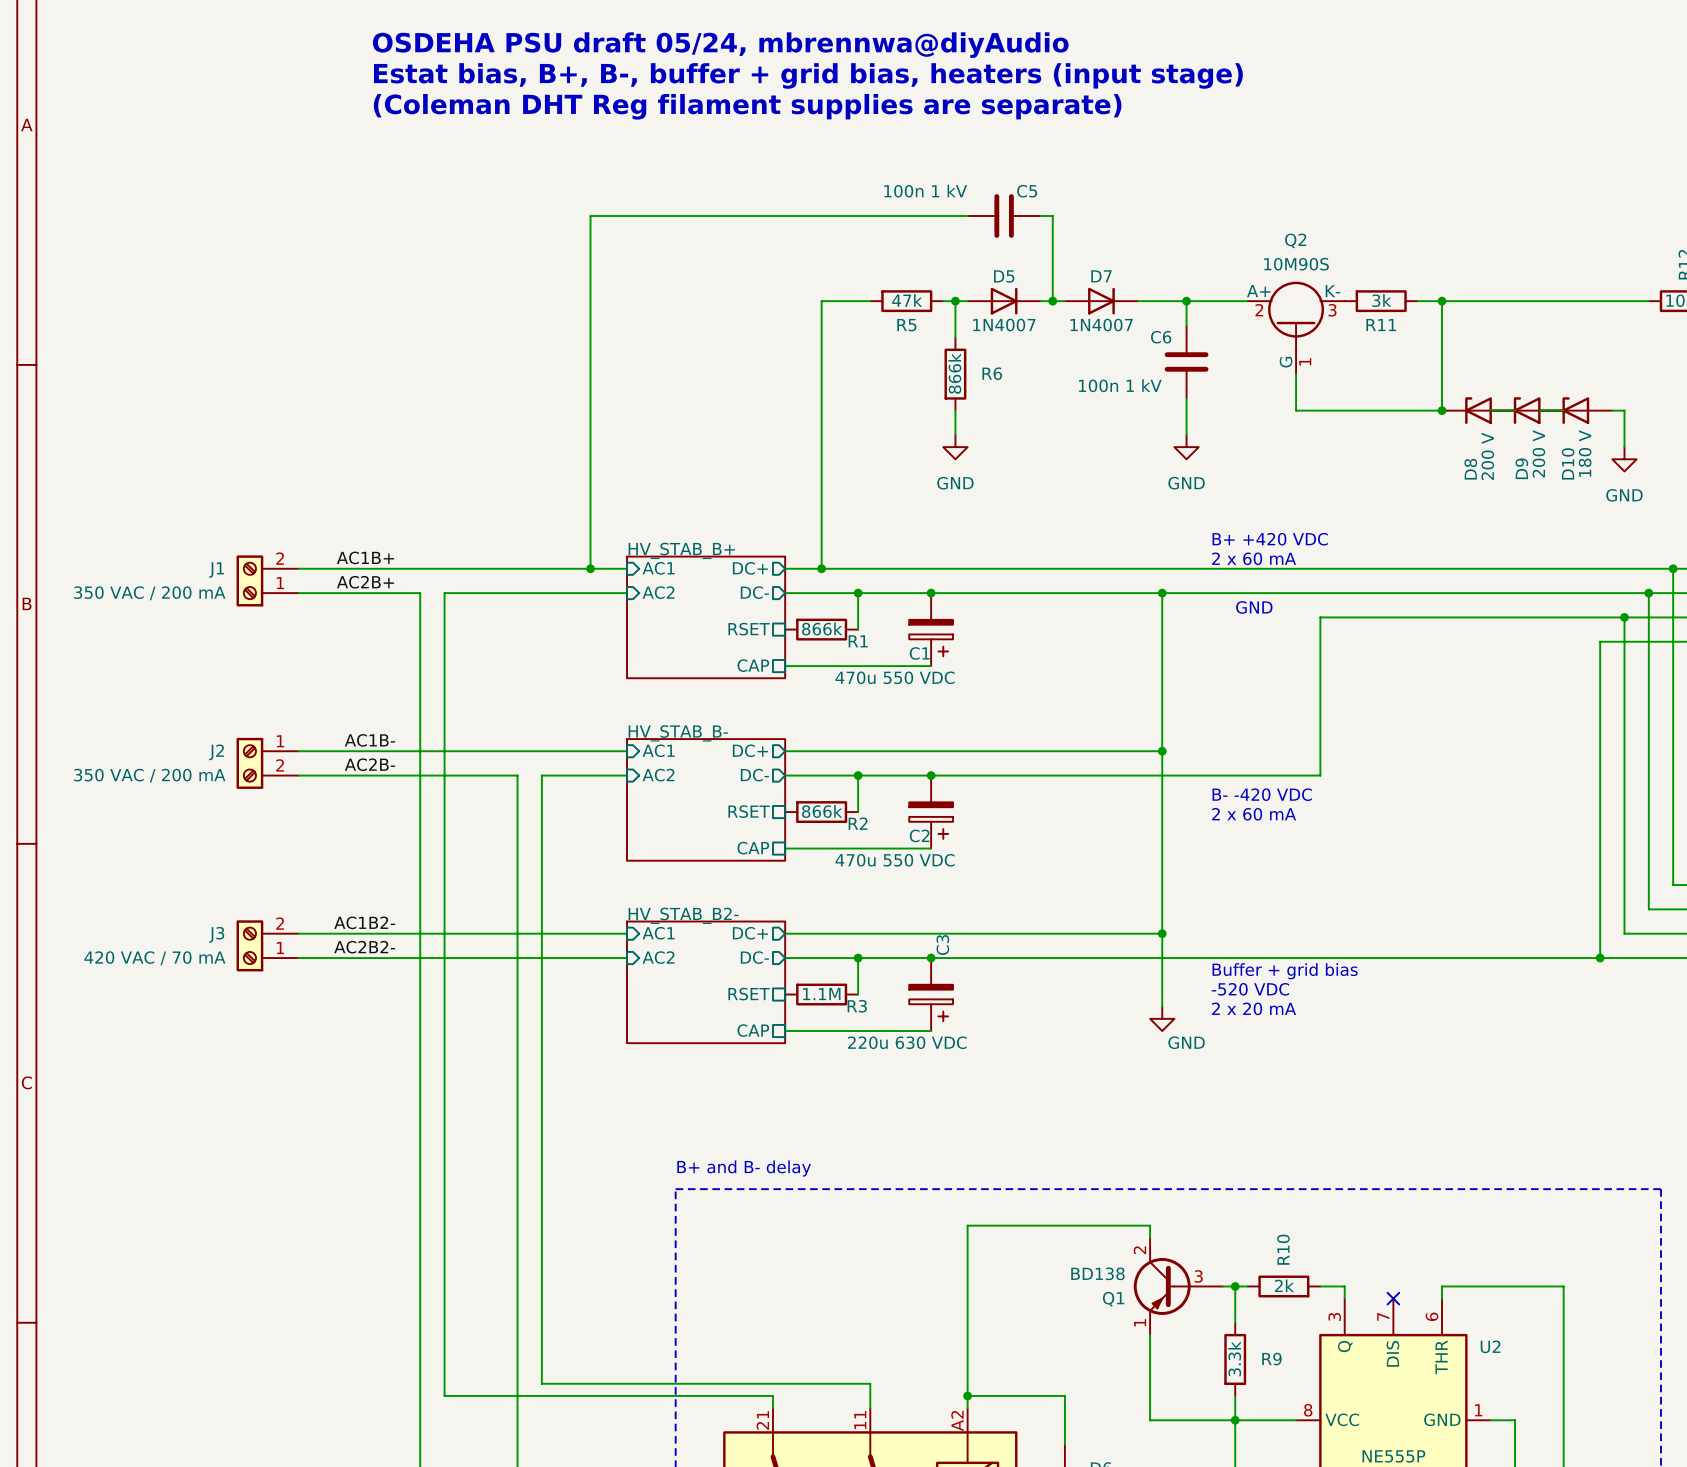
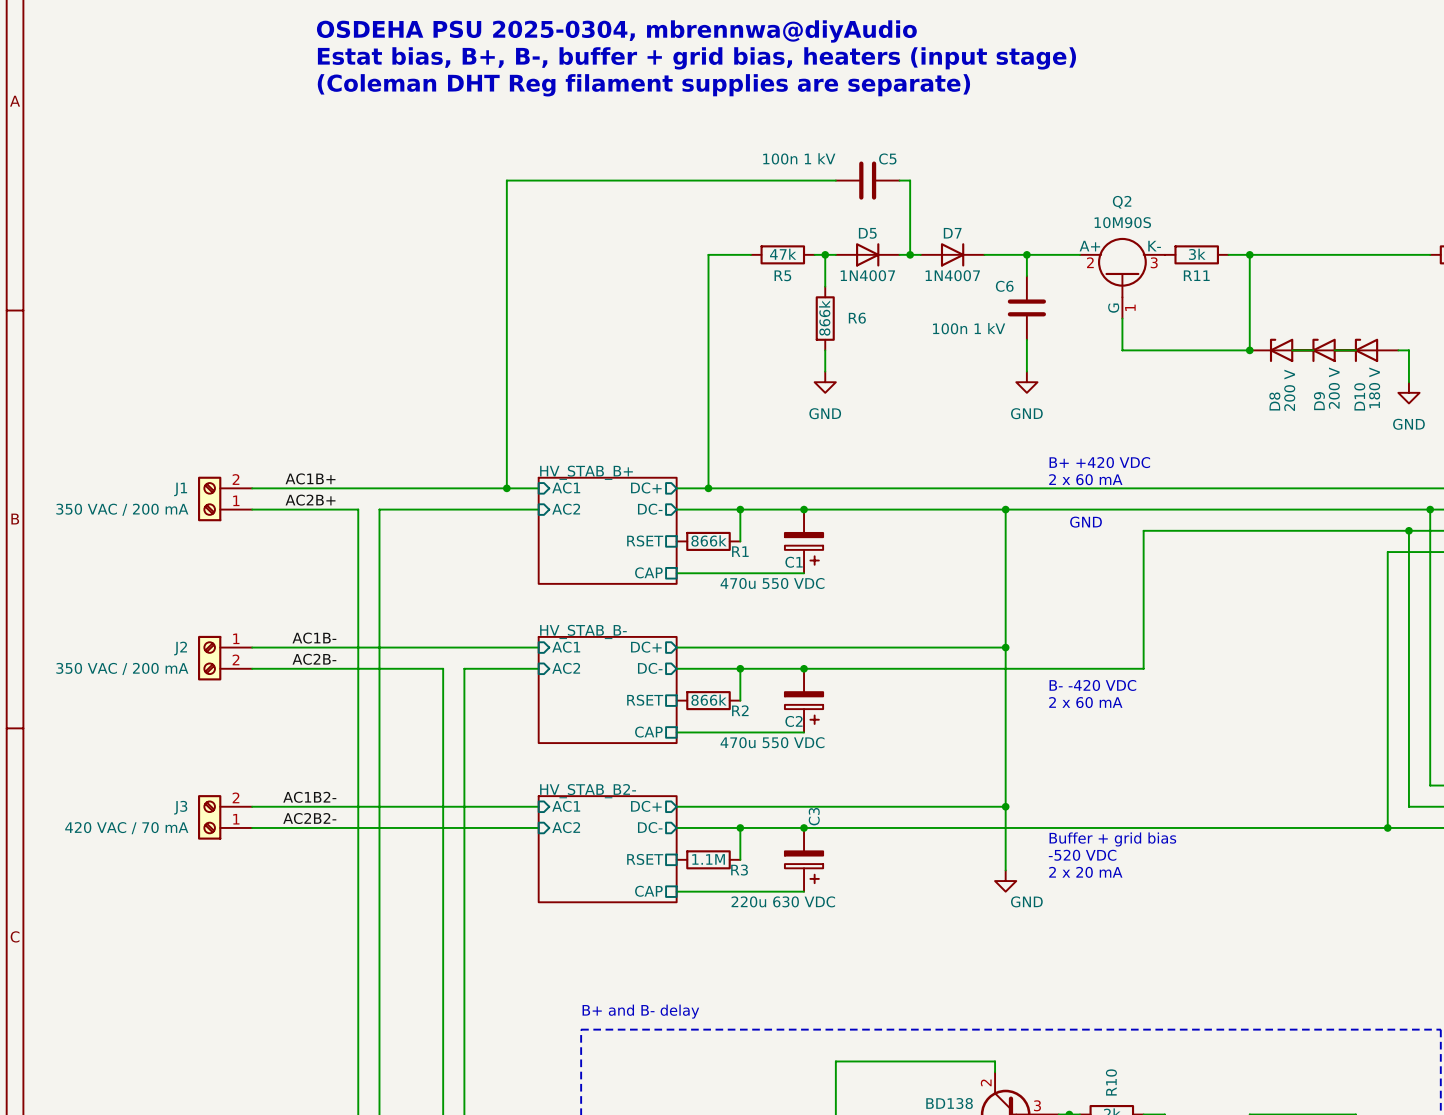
text: OSDEHA PSU draft 05/24, mbrennwa@diyAudio (720, 45) -> OSDEHA PSU 2025-0304, mbrennwa@diyAudio (616, 31)

